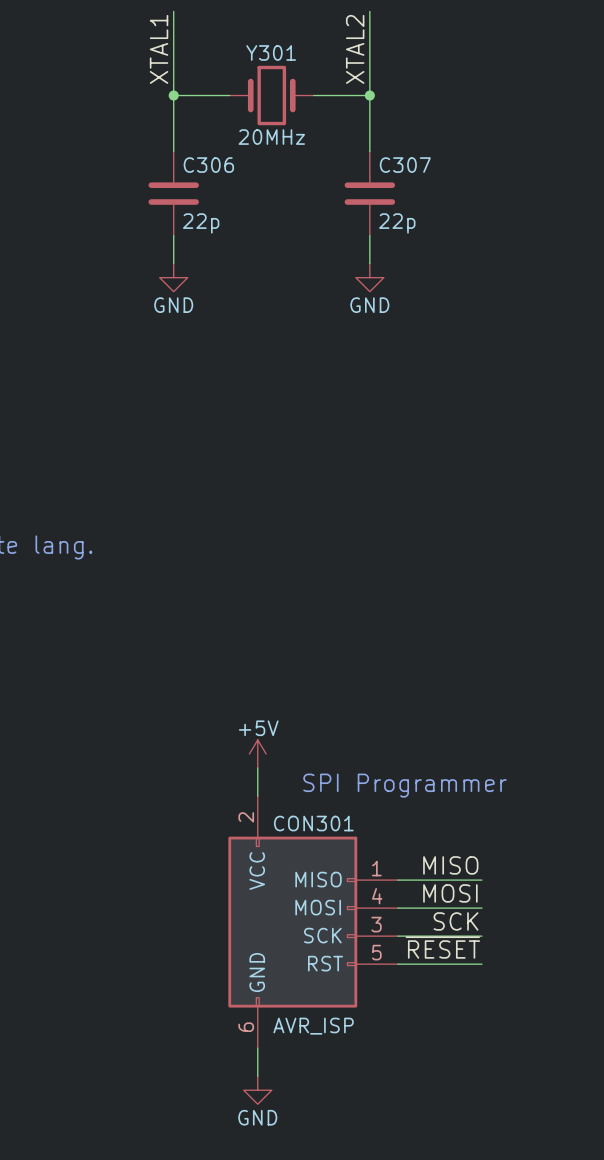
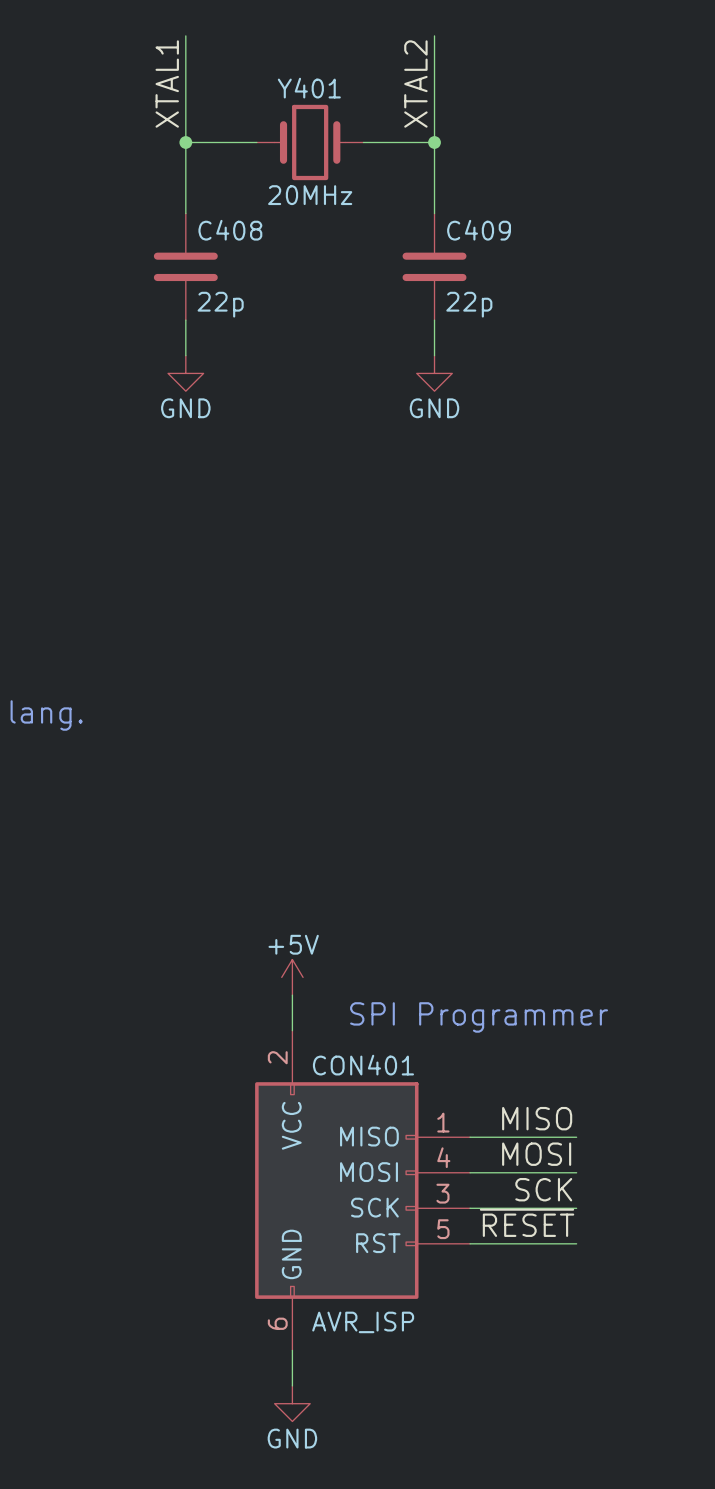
Y301 name: Y301 (271, 52) -> Y401 (309, 88)
C306 name: C306 (208, 165) -> C408 (230, 230)
C307 name: C307 (405, 165) -> C409 (479, 230)
CON301 name: CON301 (313, 823) -> CON401 (363, 1065)

